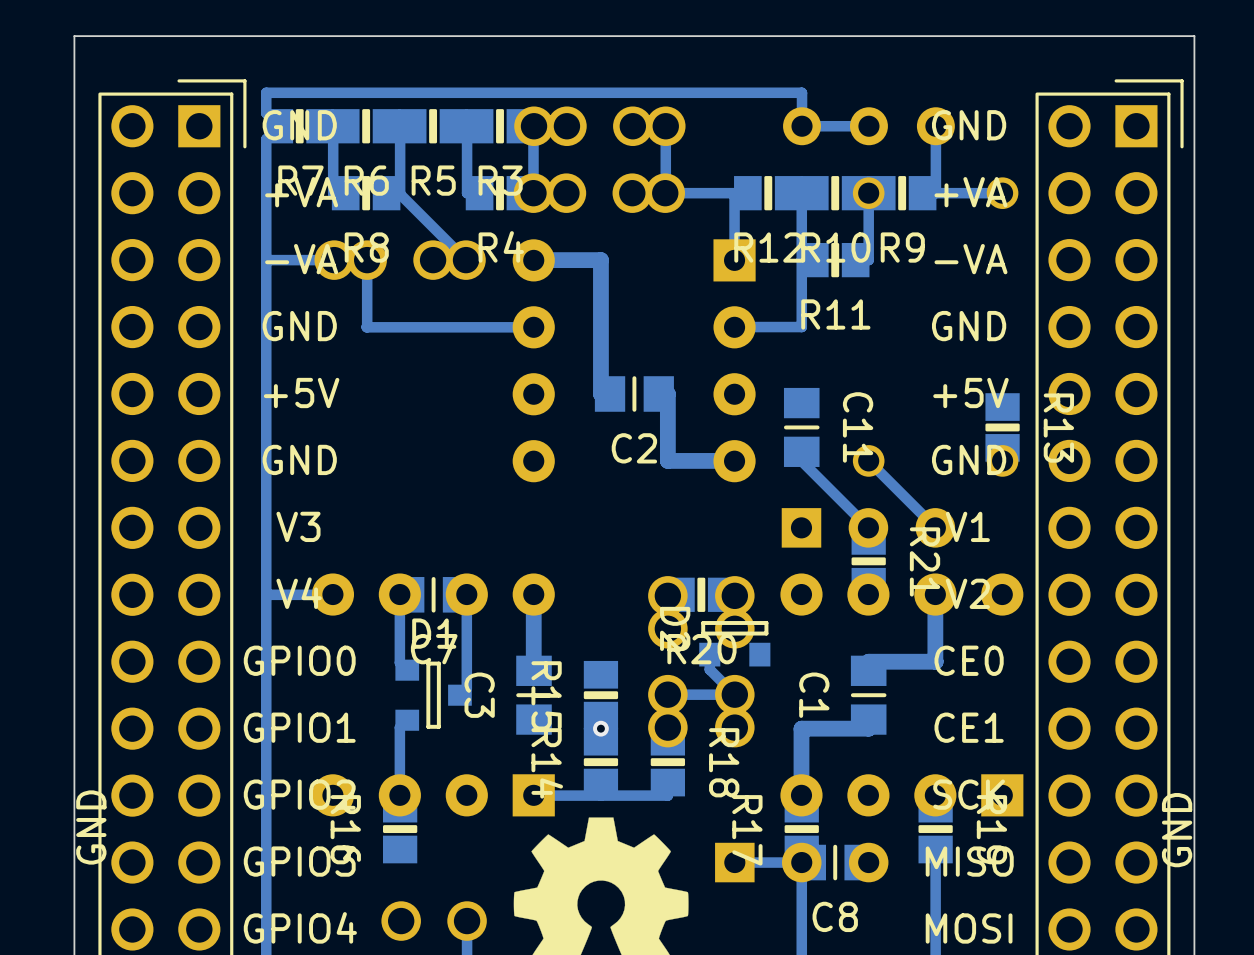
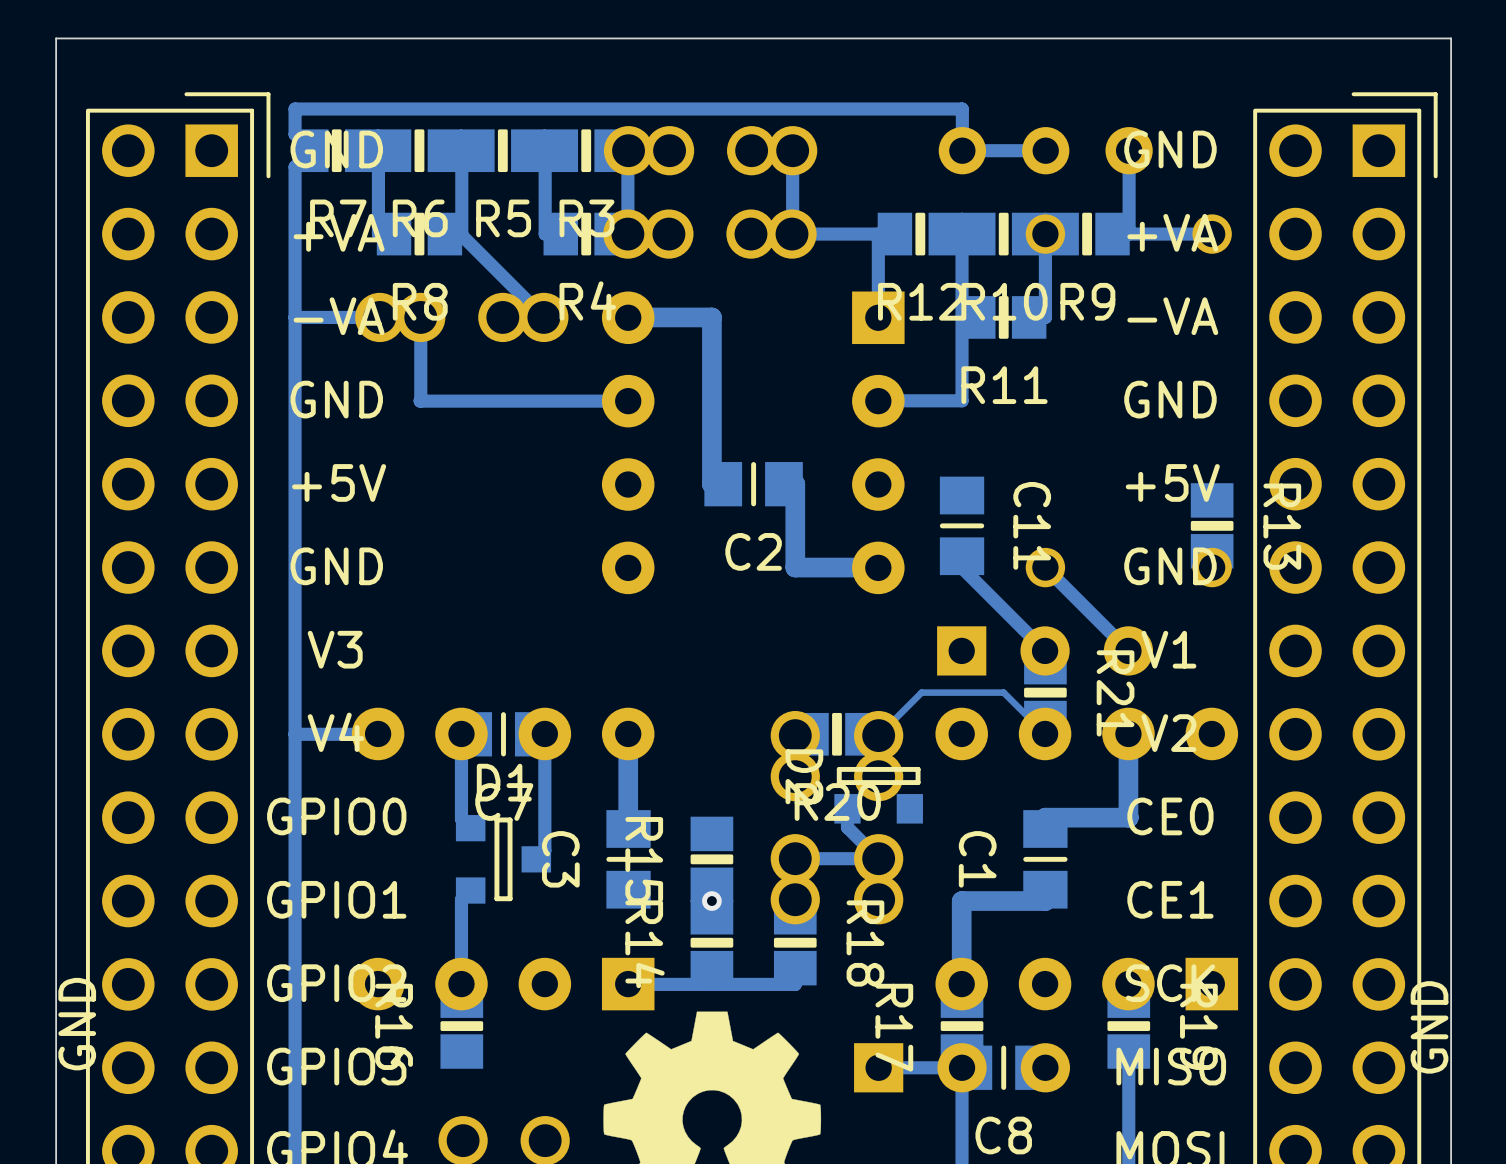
track: none -> (1045, 733) (1003, 692) (921, 692) (878, 735)

